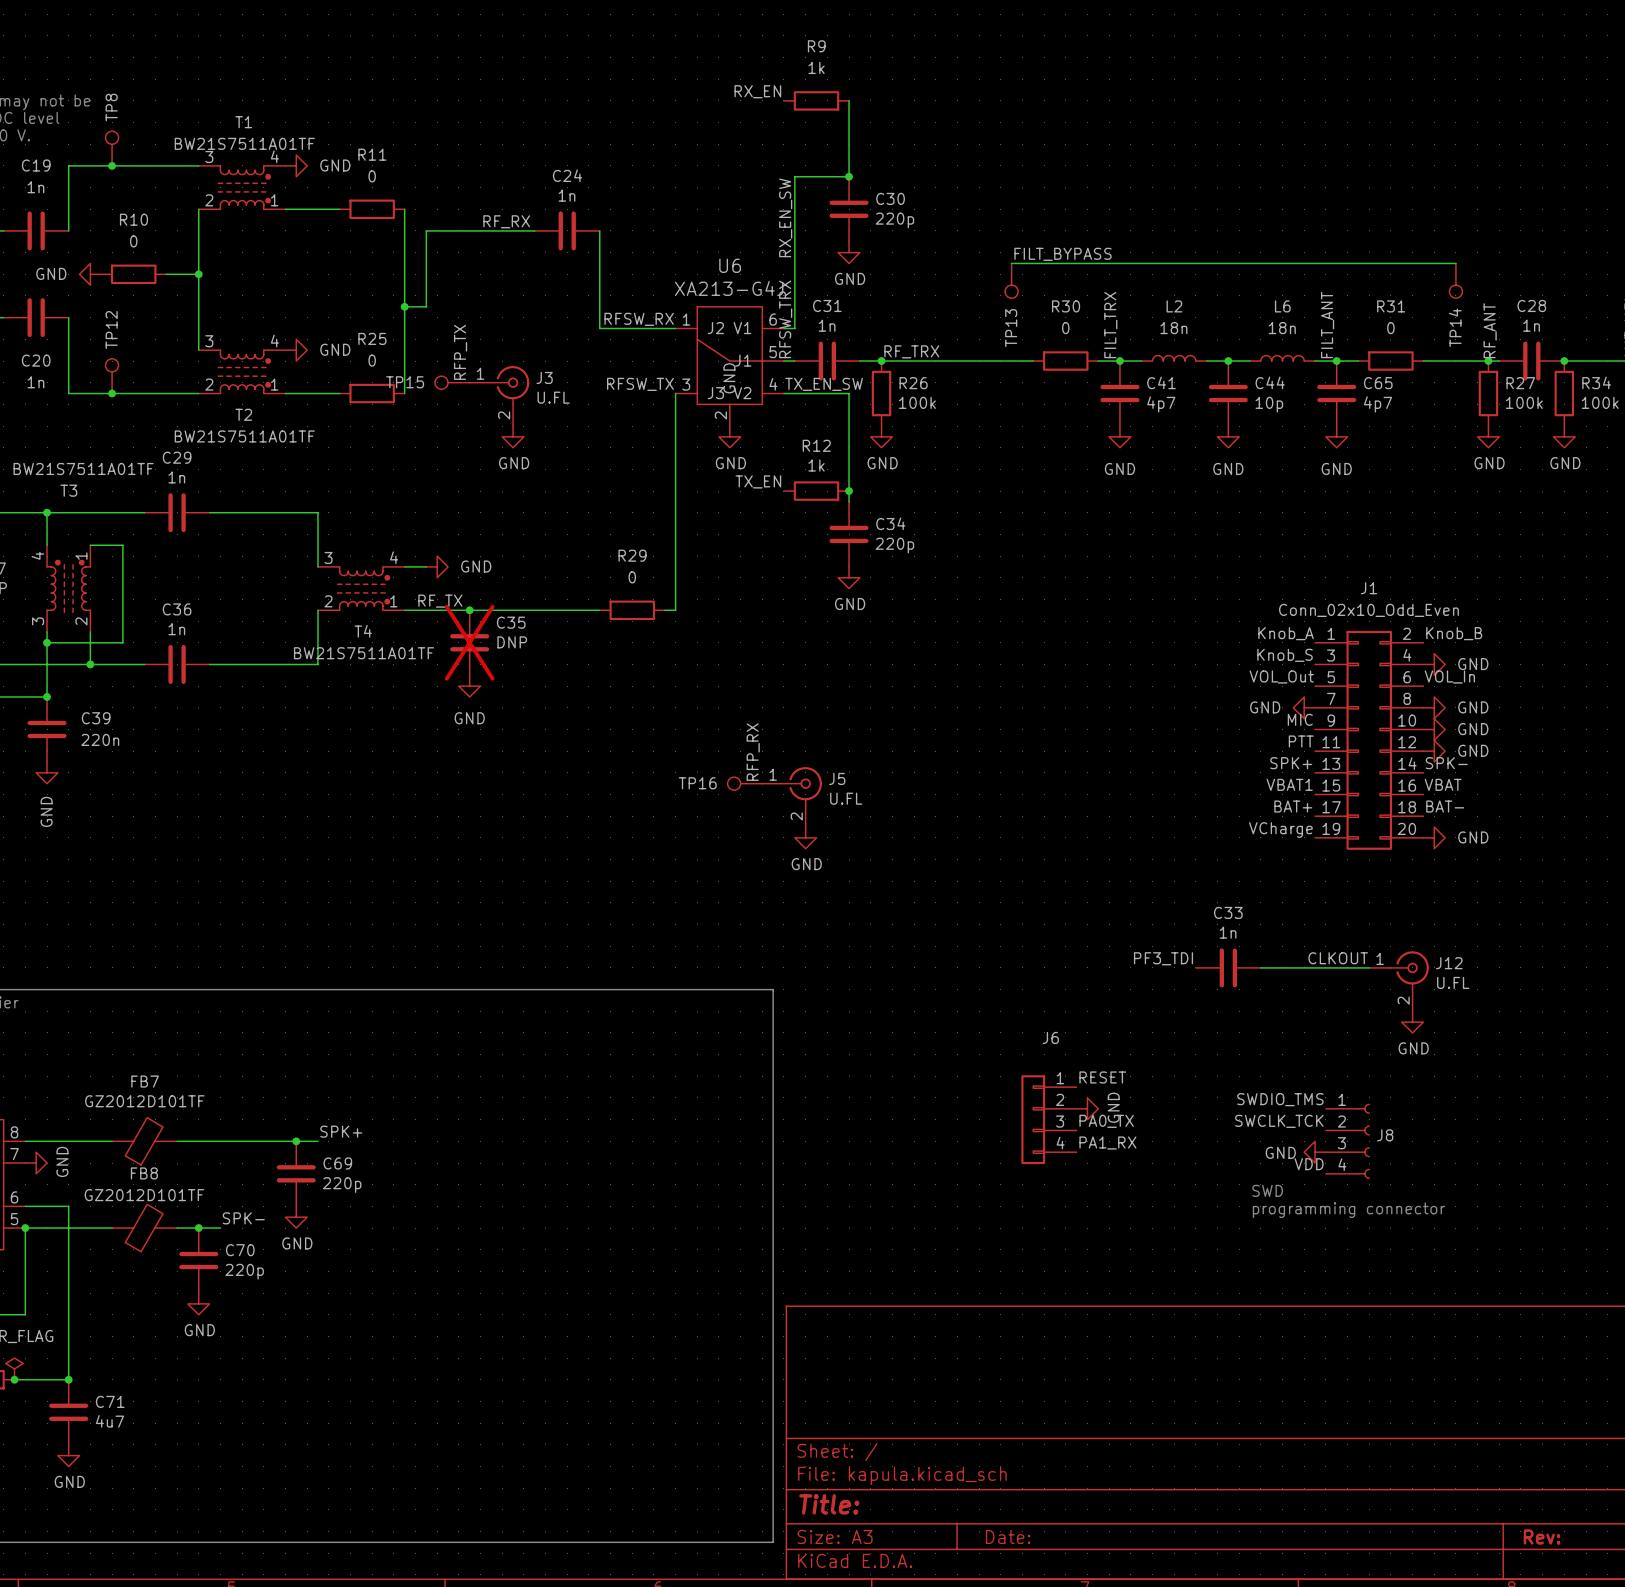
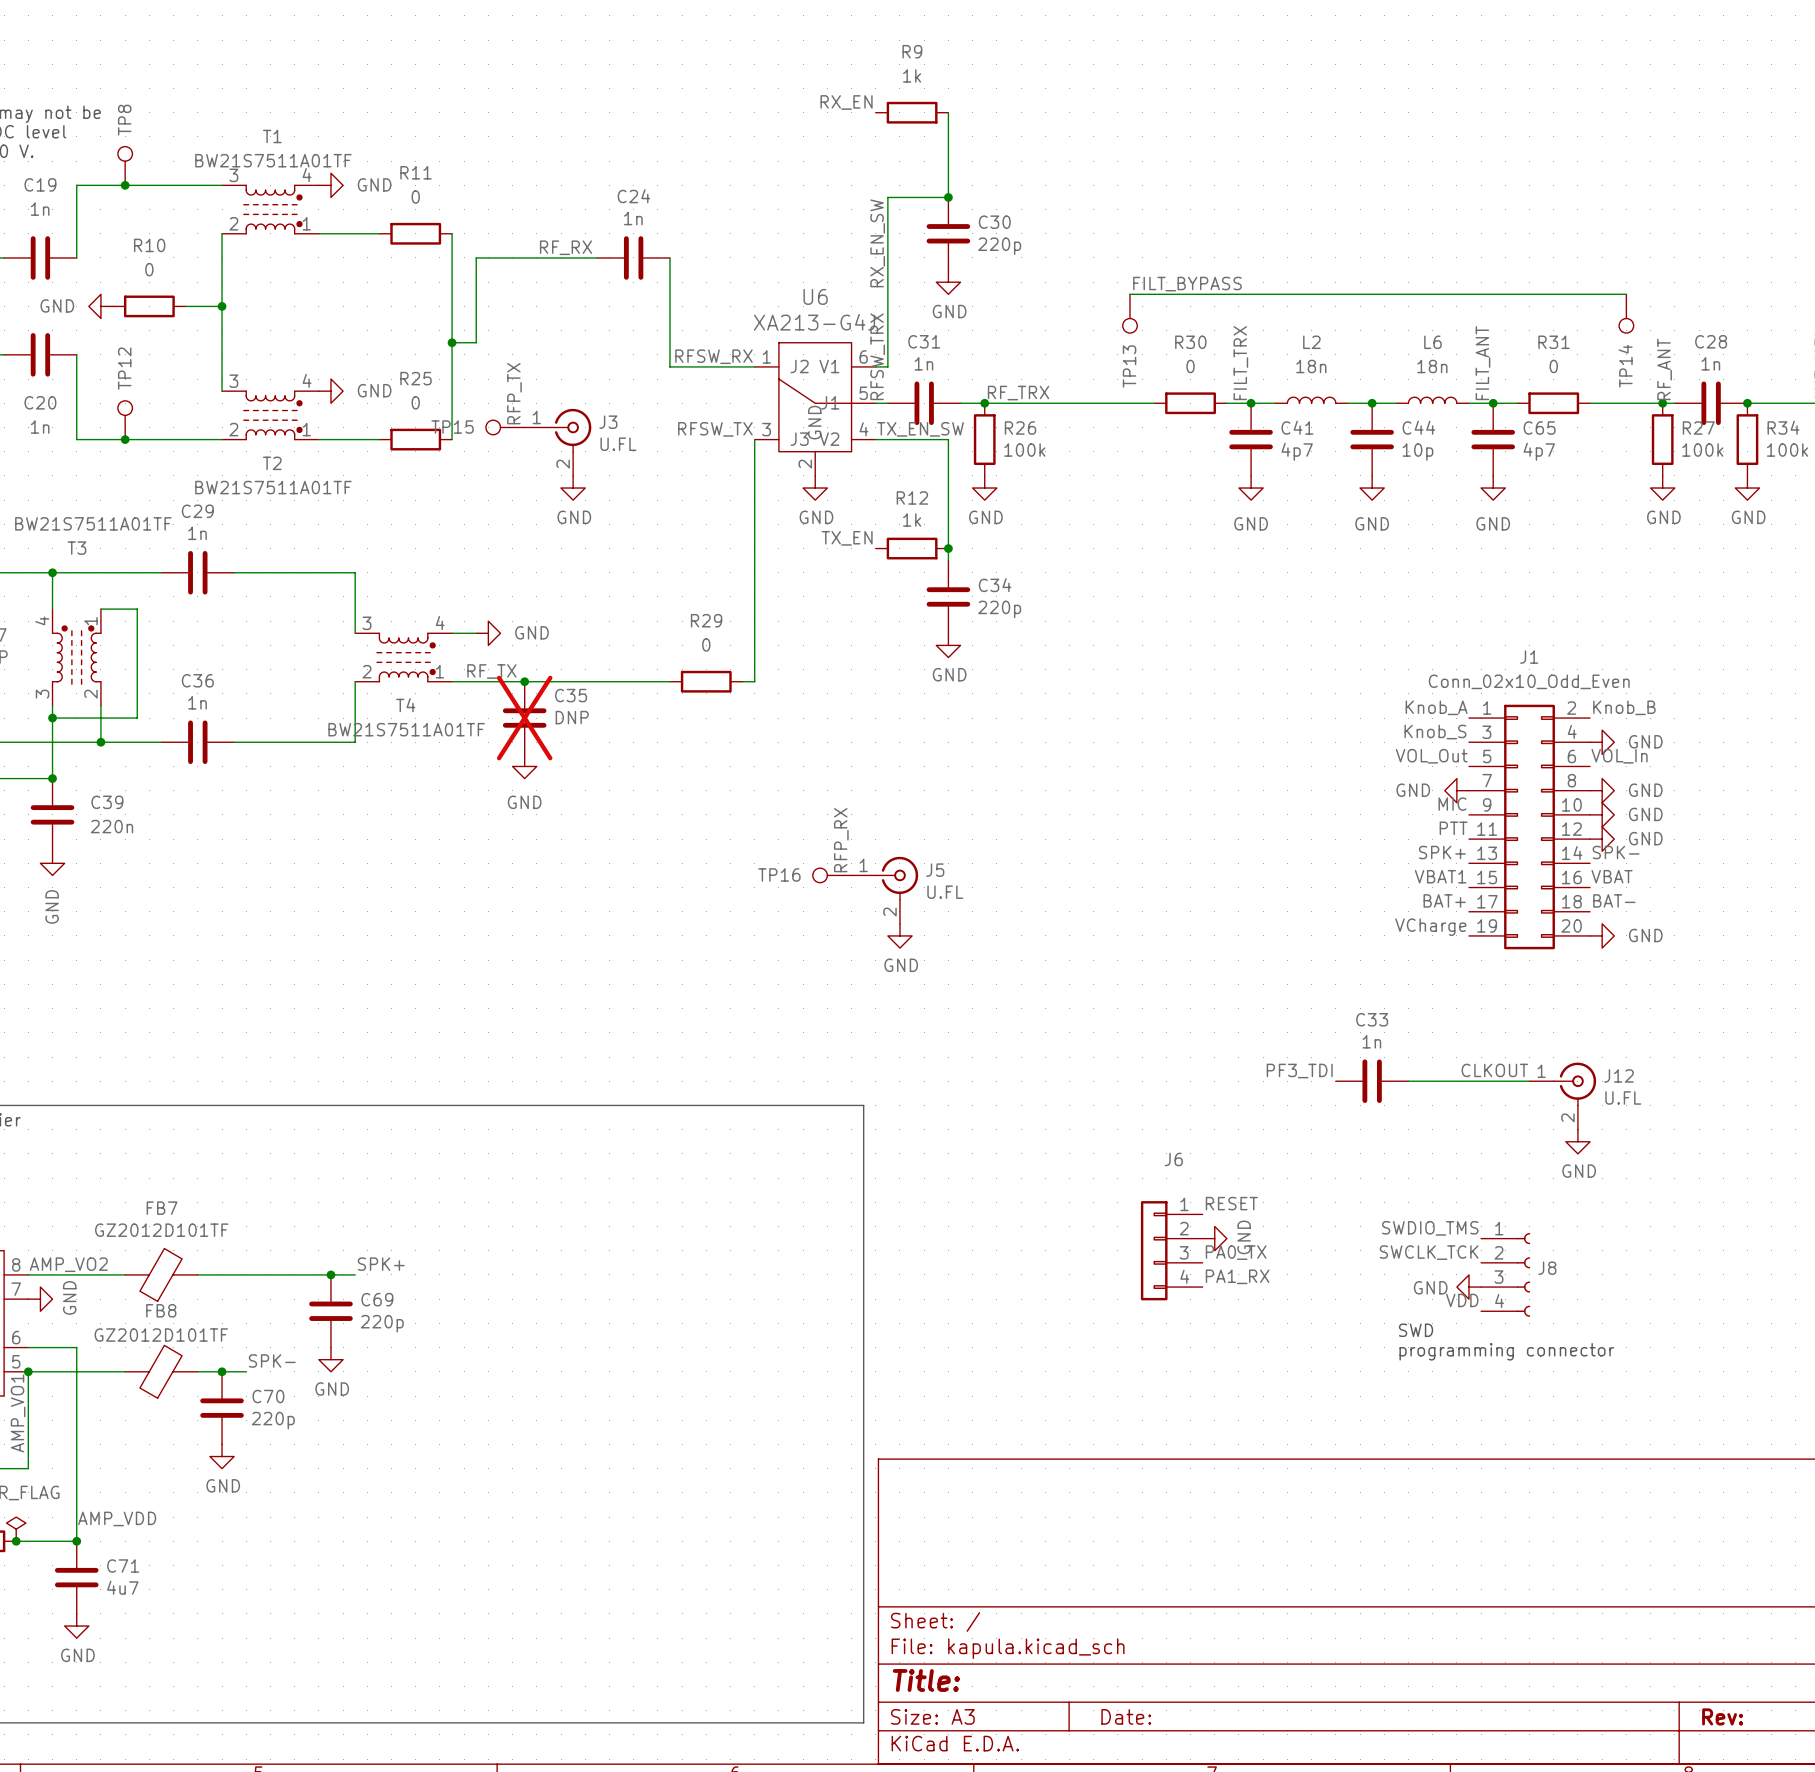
label: none -> AMP_VO2 (68, 1264)
label: none -> AMP_VO1 (18, 1413)
label: none -> AMP_VDD (117, 1518)

